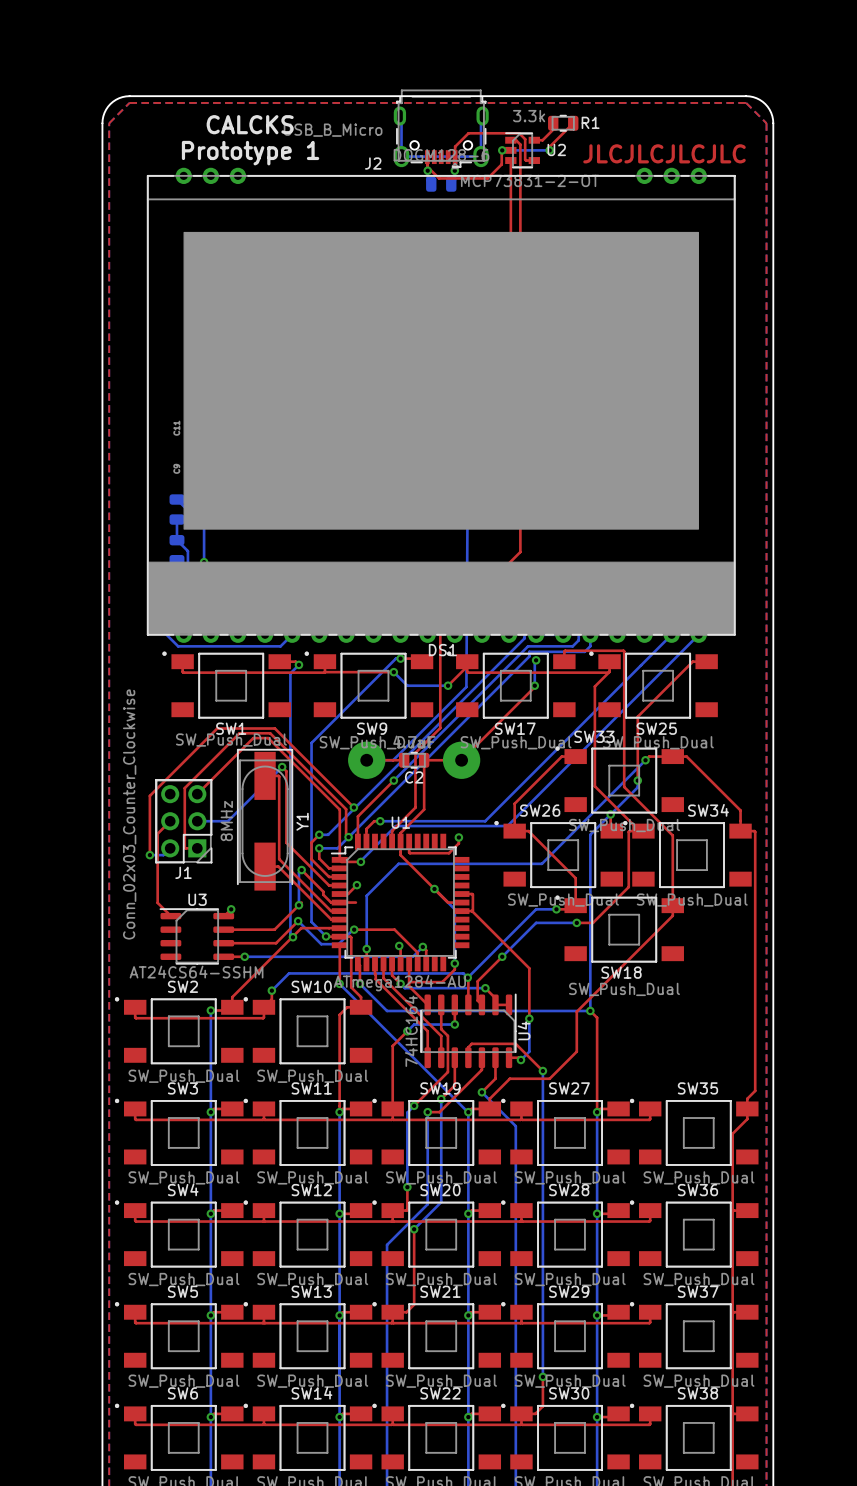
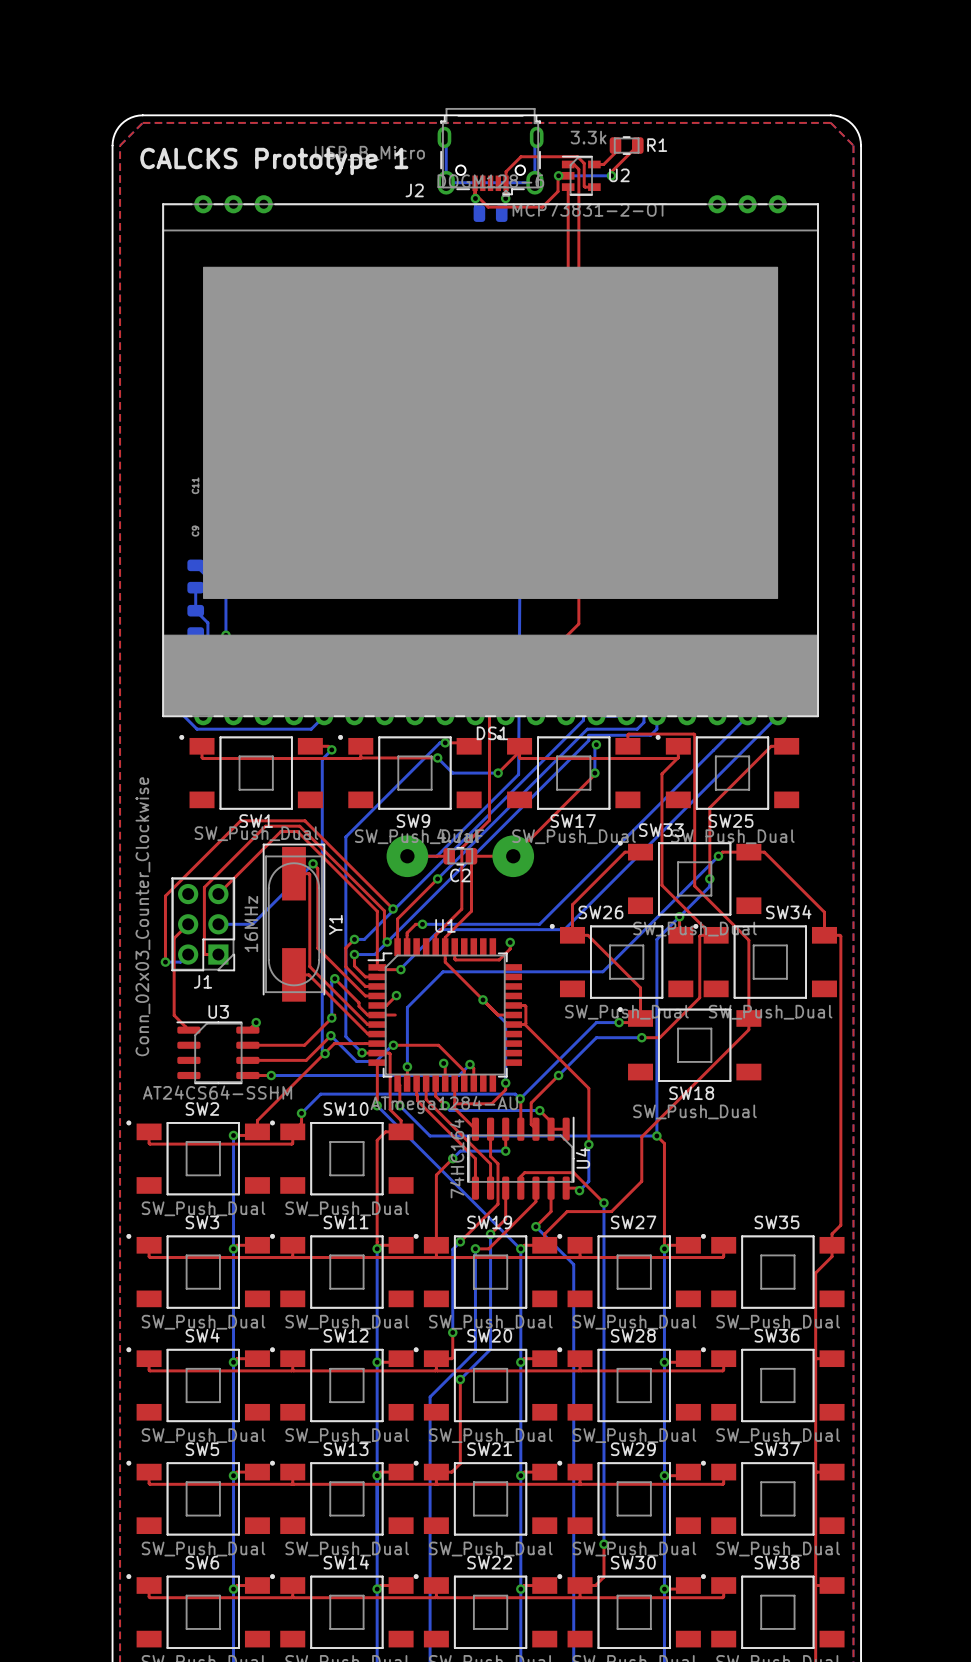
text: CALCKS (250, 124) -> none
text: Prototype 1 (250, 153) -> CALCKS Prototype 1 (274, 161)
text: JLCJLCJLCJLC (664, 153) -> none
Y1 value: 8MHz (226, 820) -> 16MHz (251, 924)

